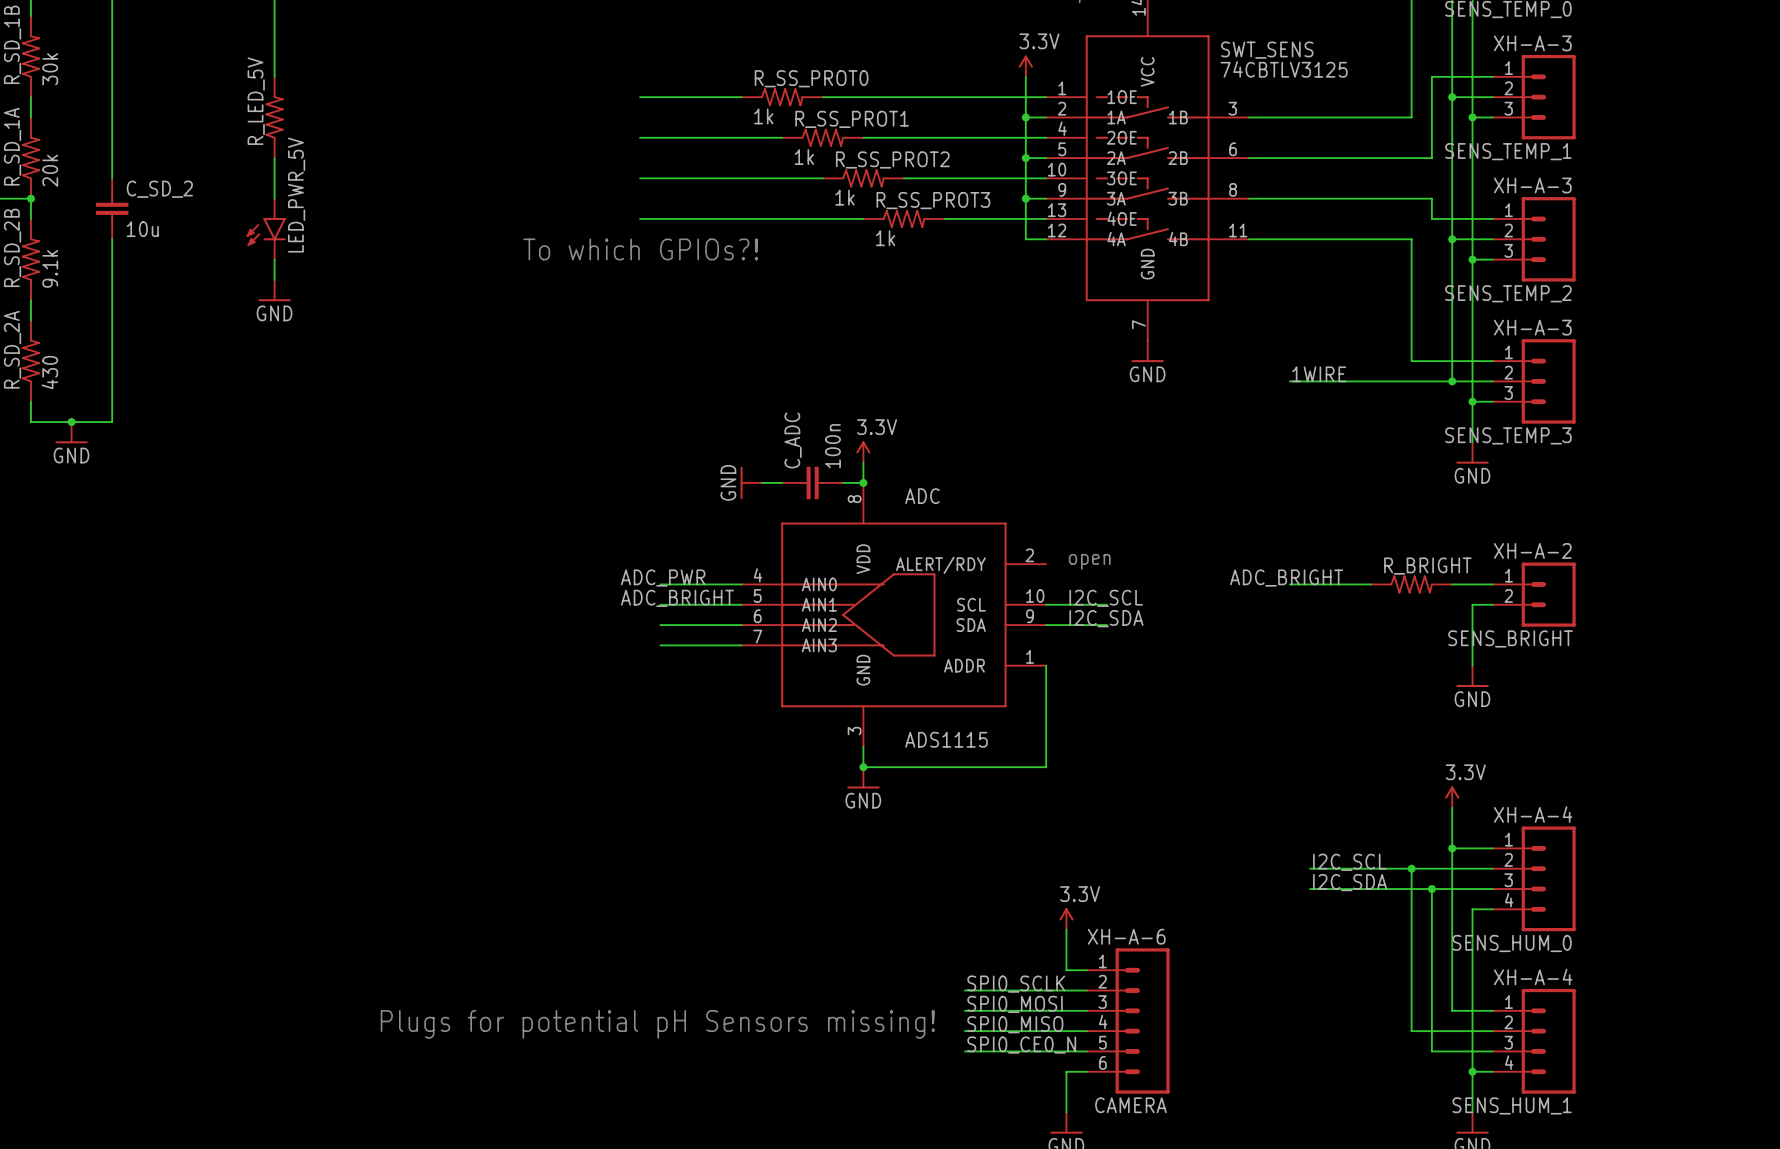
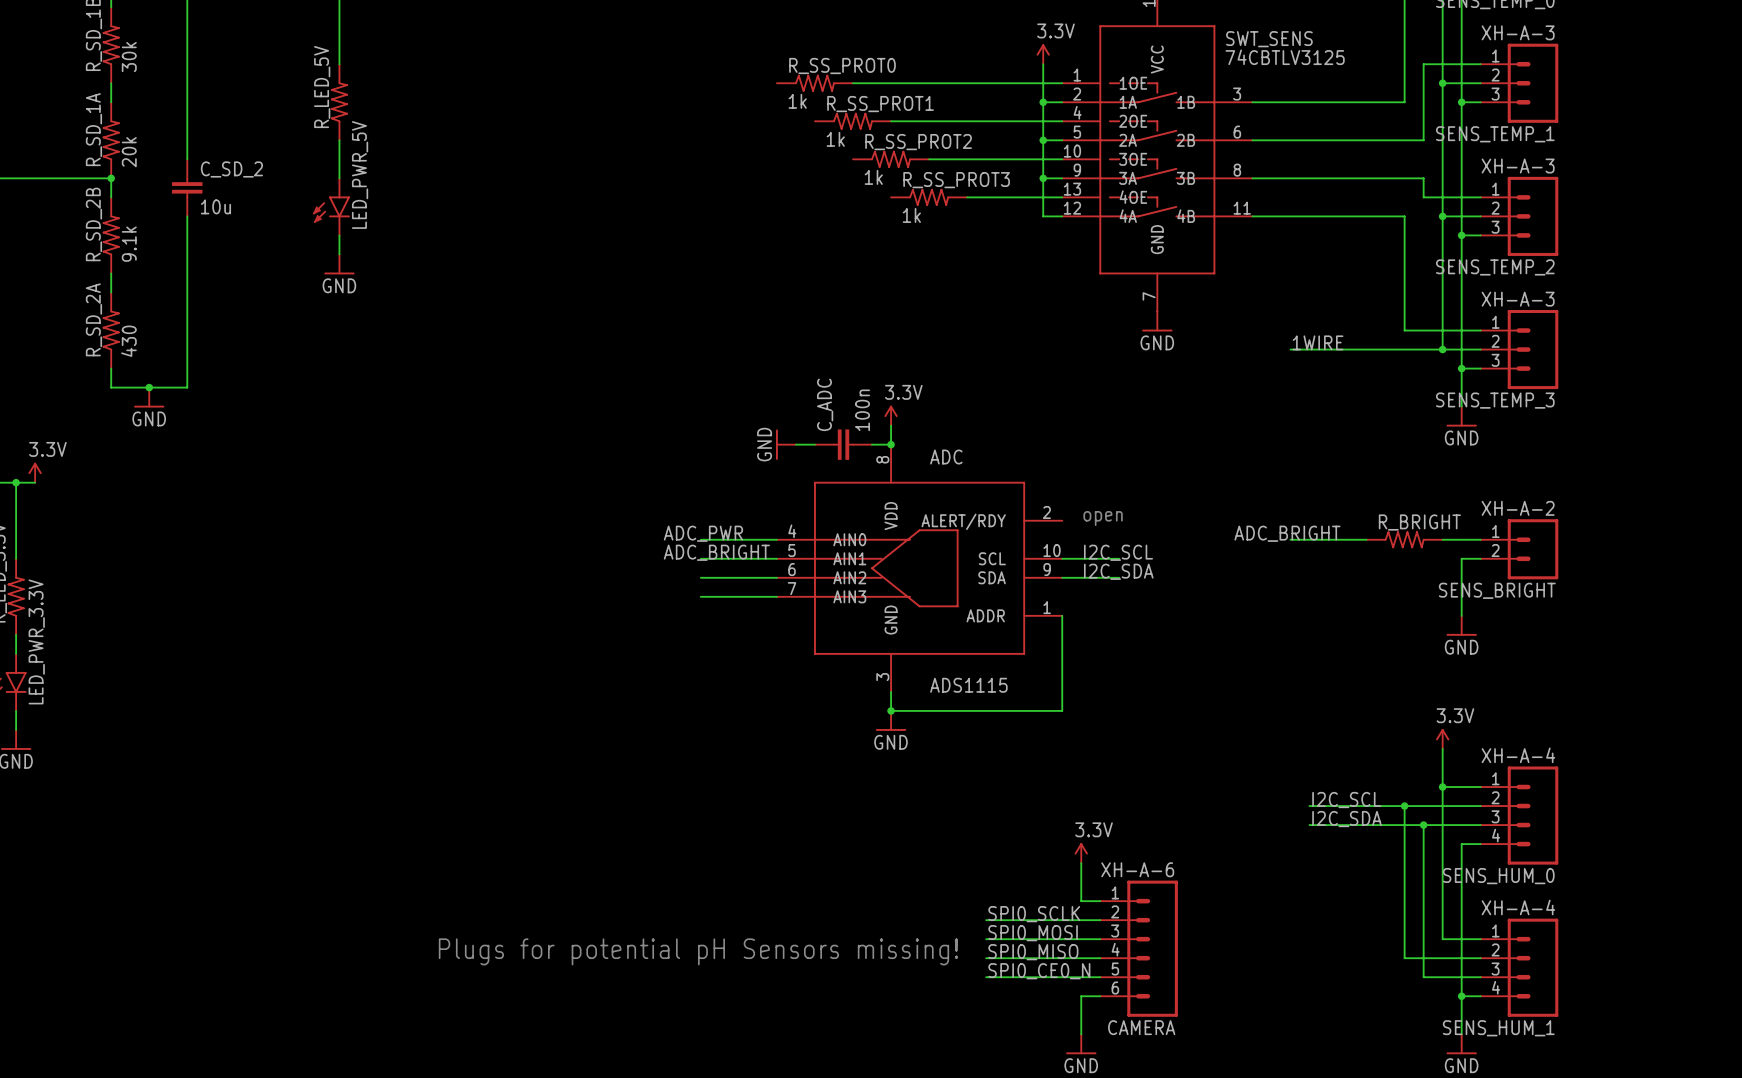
wire: (640, 97) (741, 97) -> none
wire: (640, 137) (782, 137) -> none
wire: (640, 178) (822, 178) -> none
wire: (640, 218) (863, 218) -> none
text: To which GPIOs?! (640, 249) -> none

